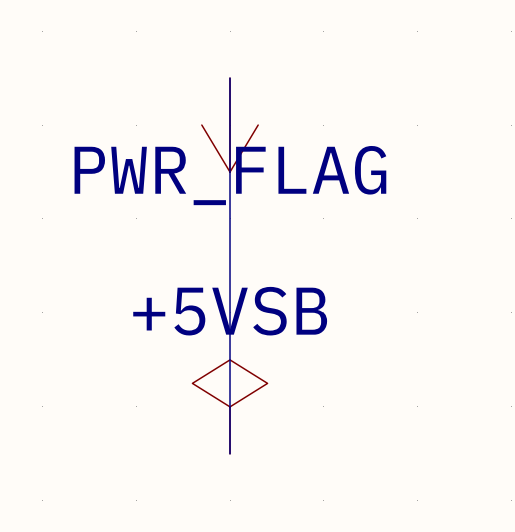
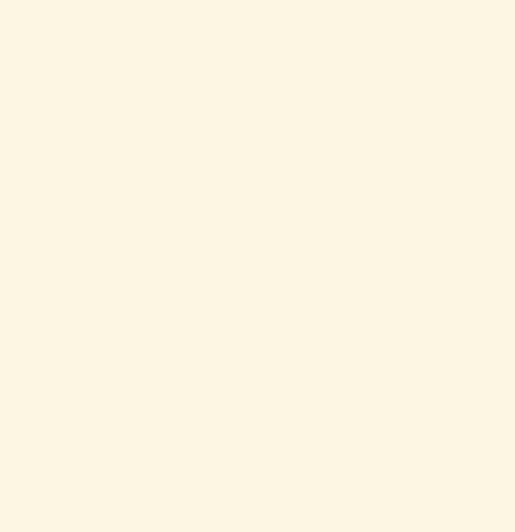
wire: (230, 78) (230, 453) -> none
power symbol: +5VSB (230, 125) -> none
power symbol: PWR_FLAG (230, 406) -> none

